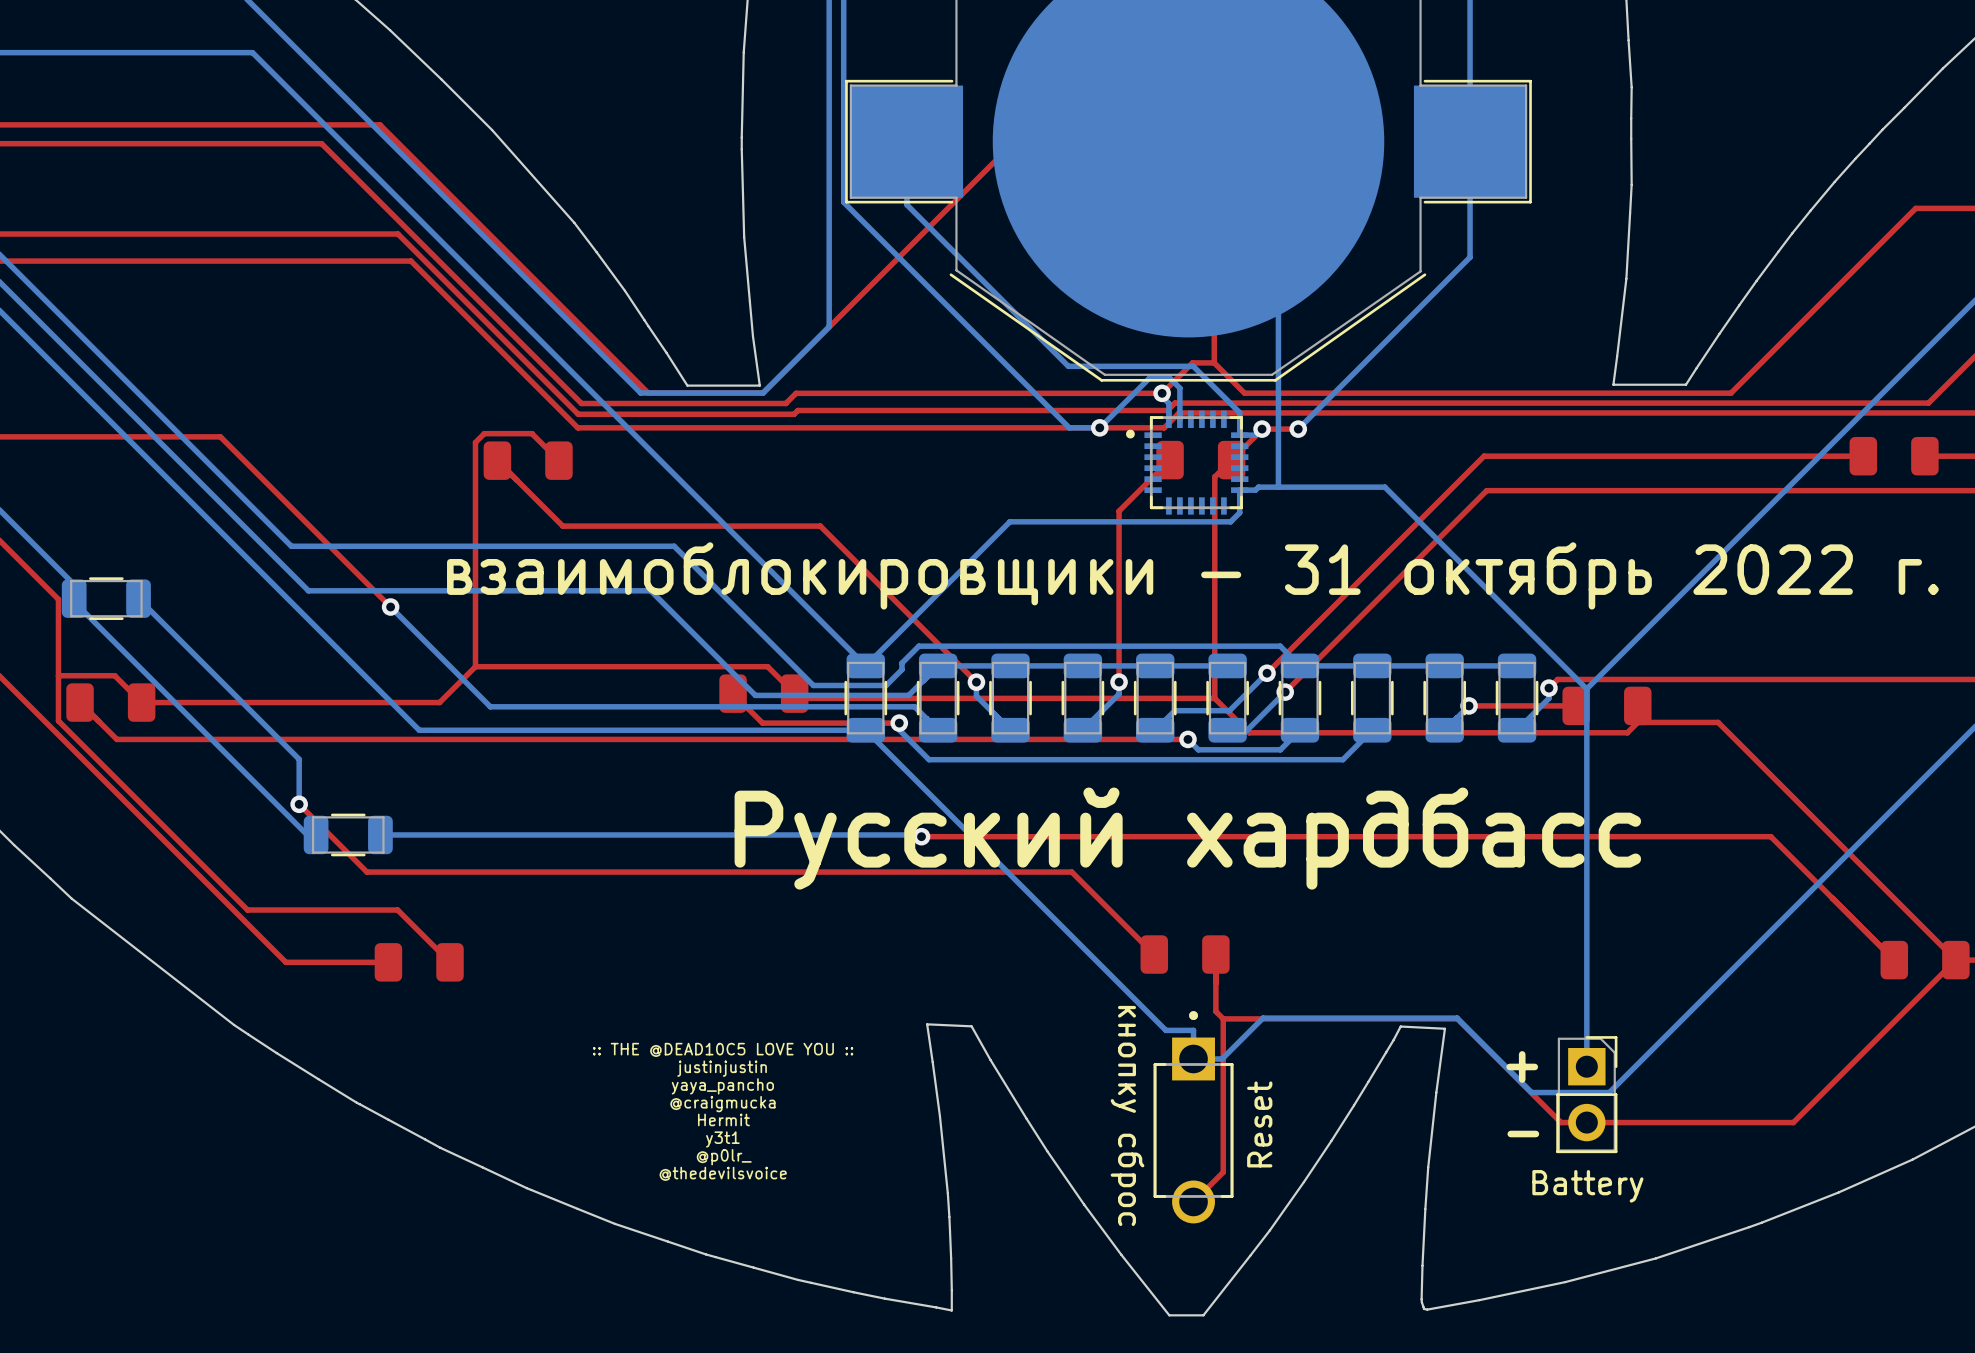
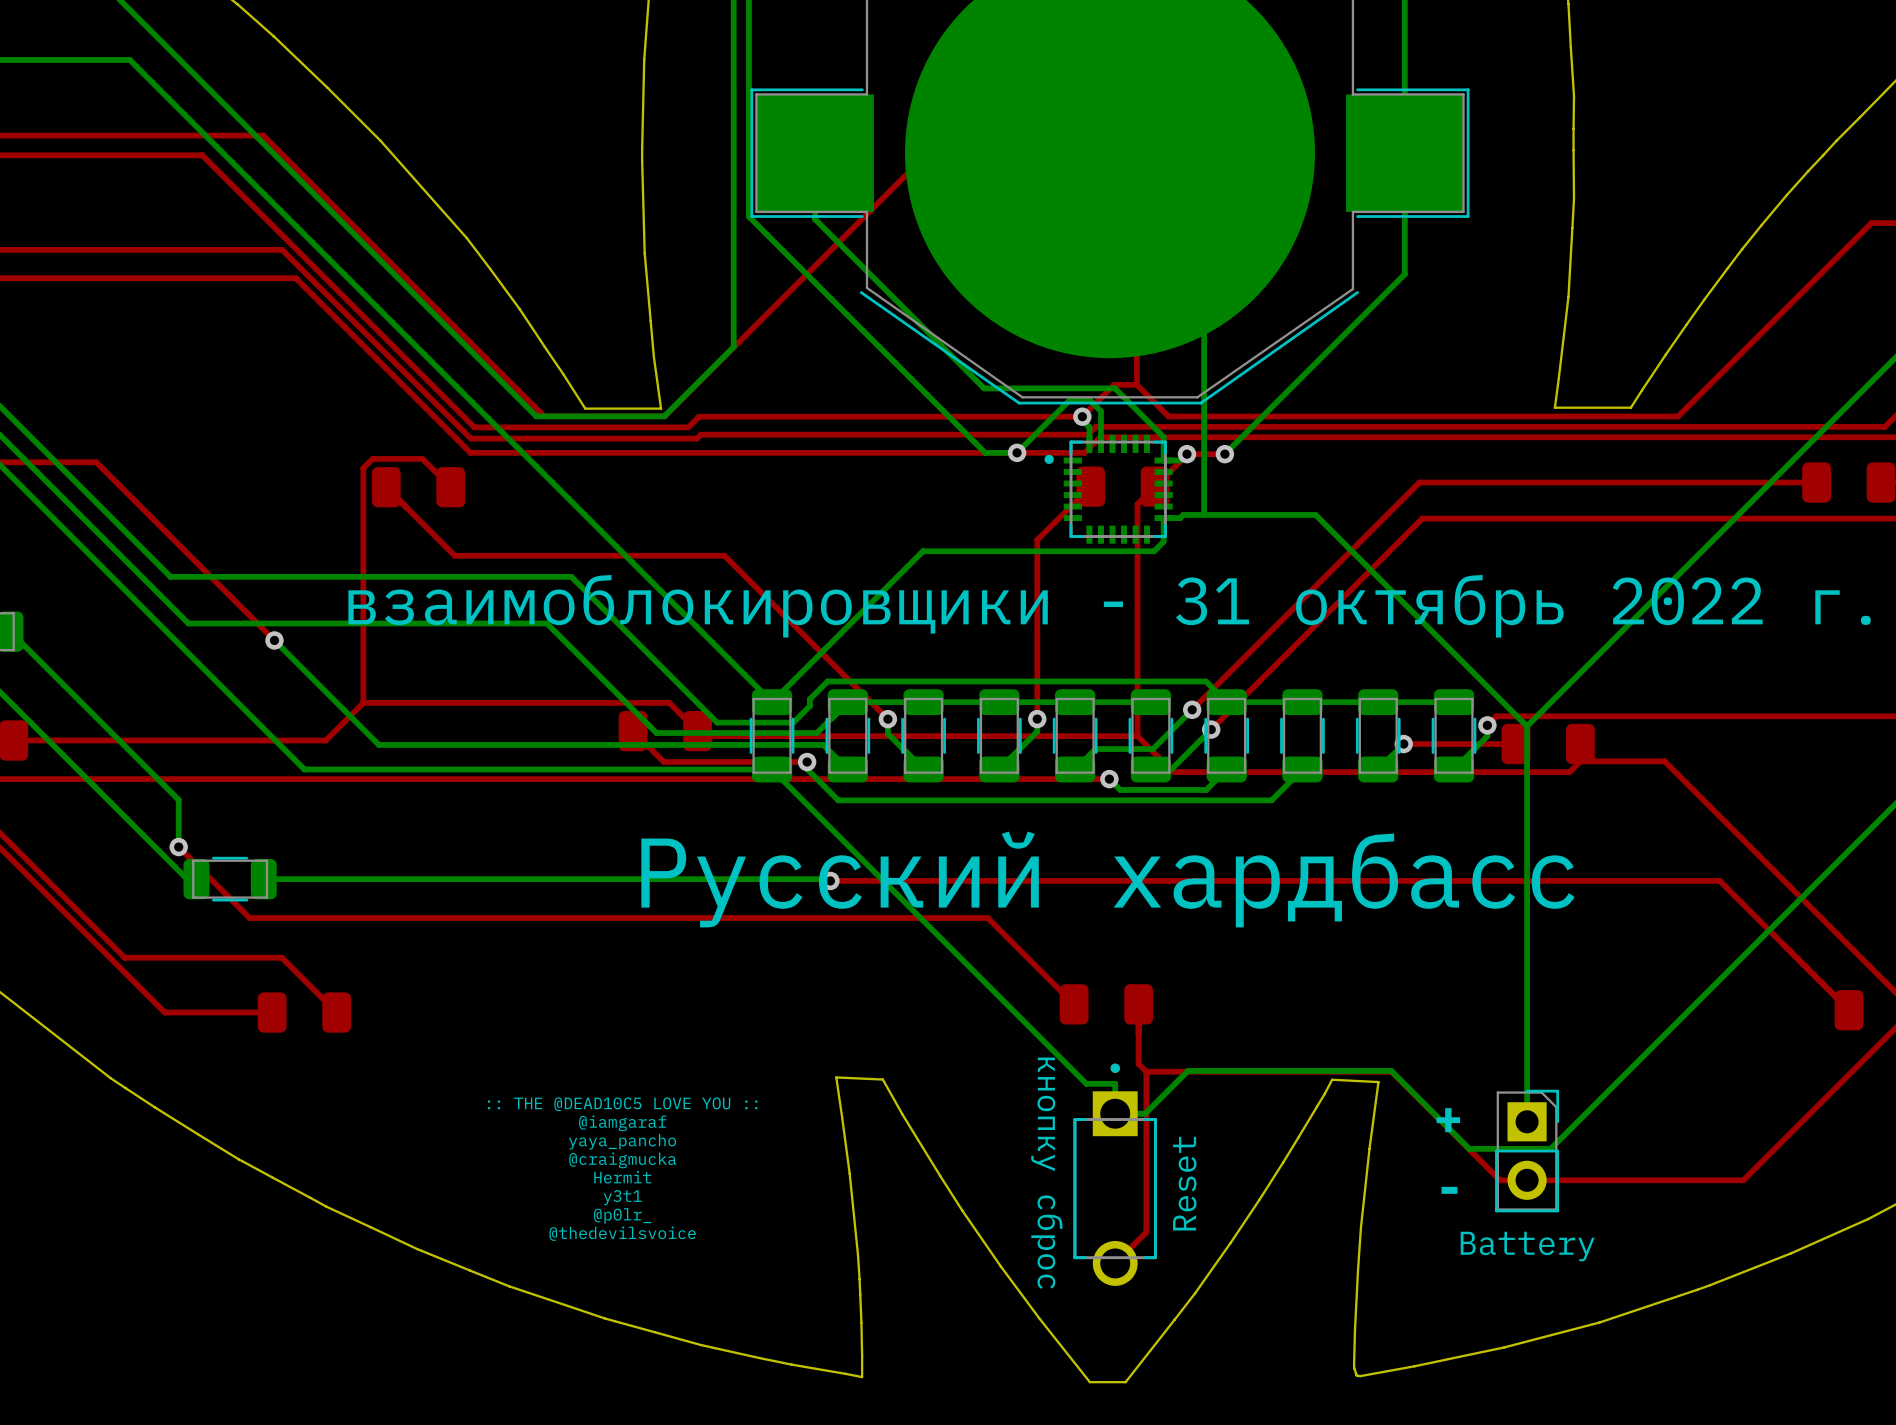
text: justinjustin (722, 1068) -> @iamgaraf (622, 1123)

